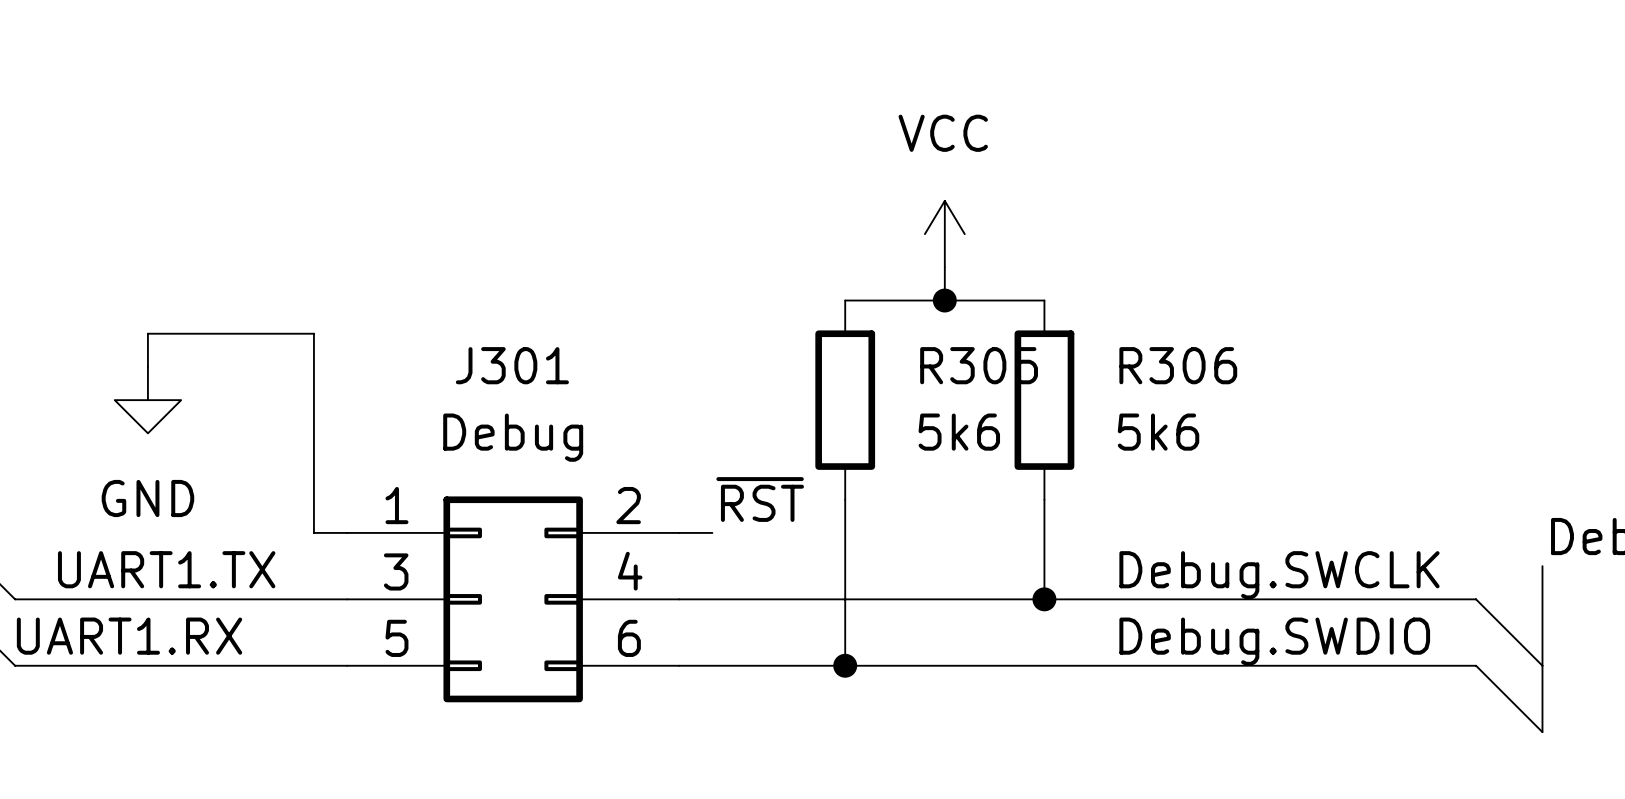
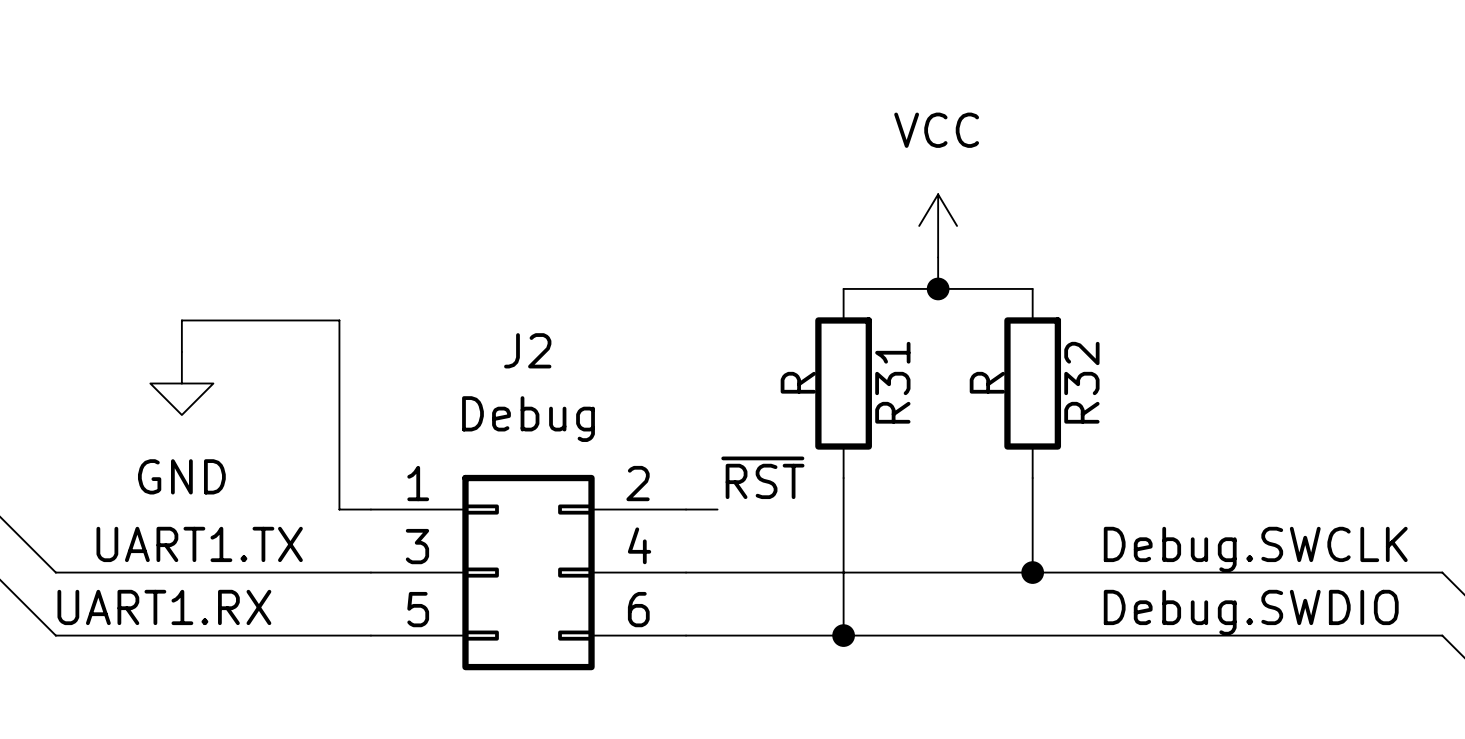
J301 name: J301 (512, 365) -> J2 (527, 350)
R305 name: R305 (979, 365) -> R31 (892, 382)
R306 name: R306 (1178, 365) -> R32 (1081, 382)
R305 value: 5k6 (959, 432) -> R (798, 382)
R306 value: 5k6 (1158, 432) -> R (987, 382)

